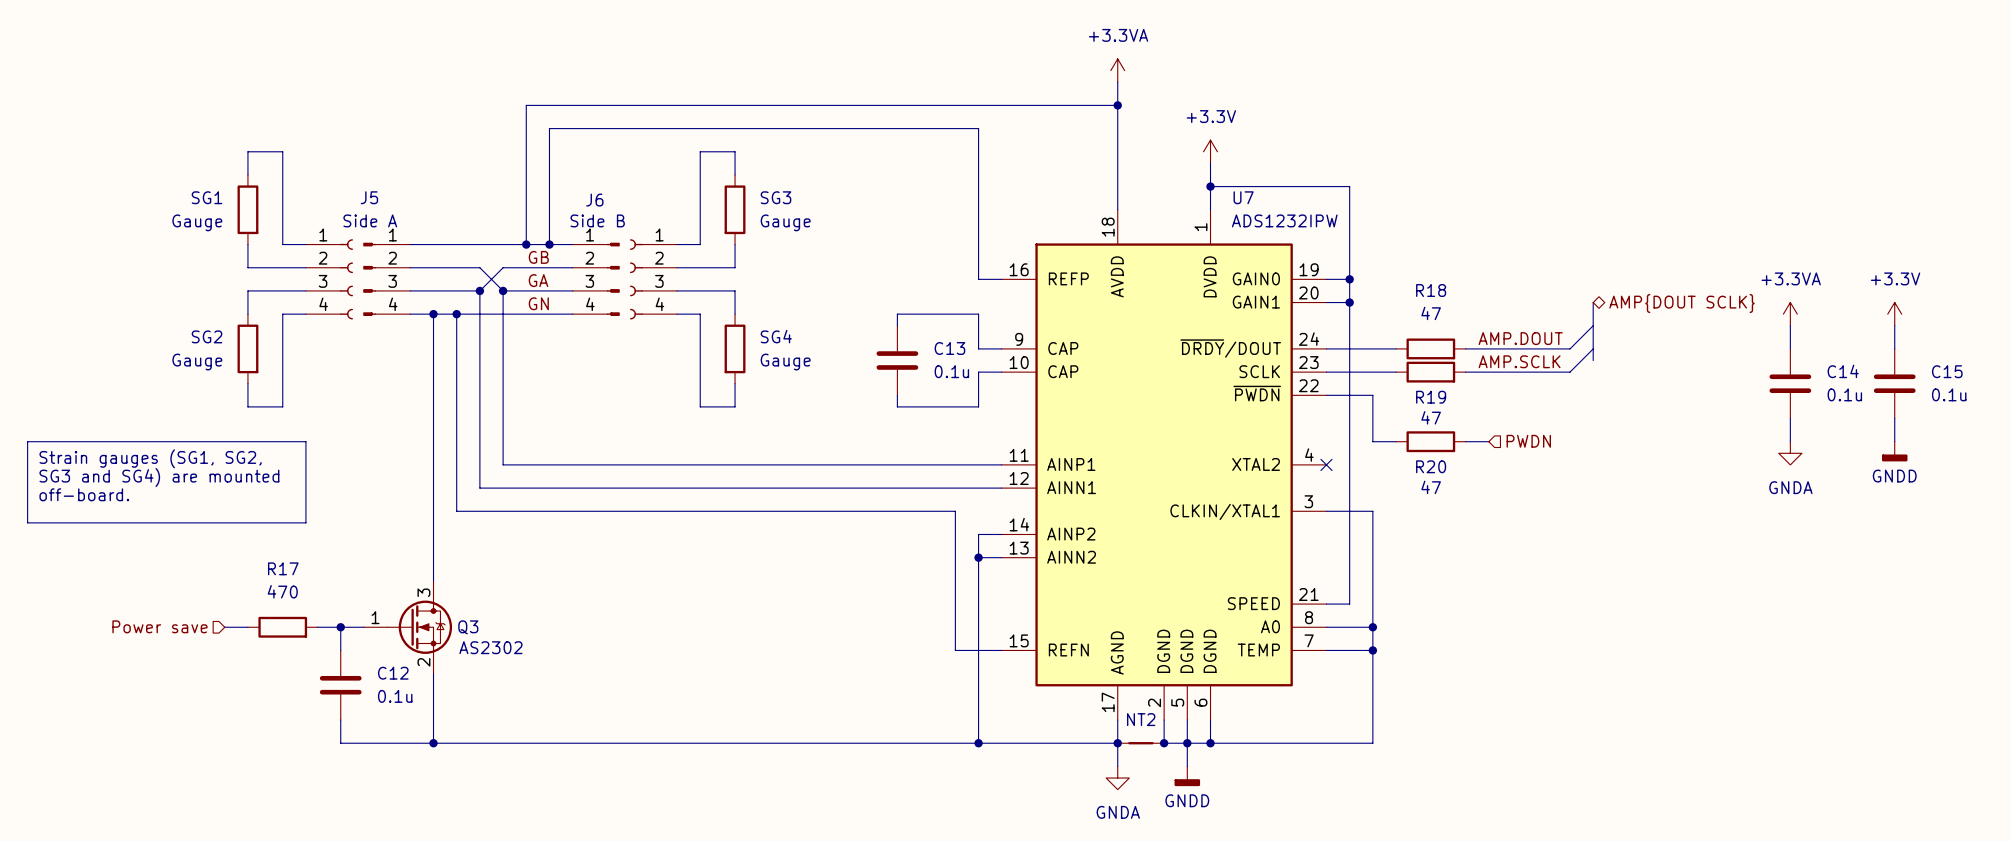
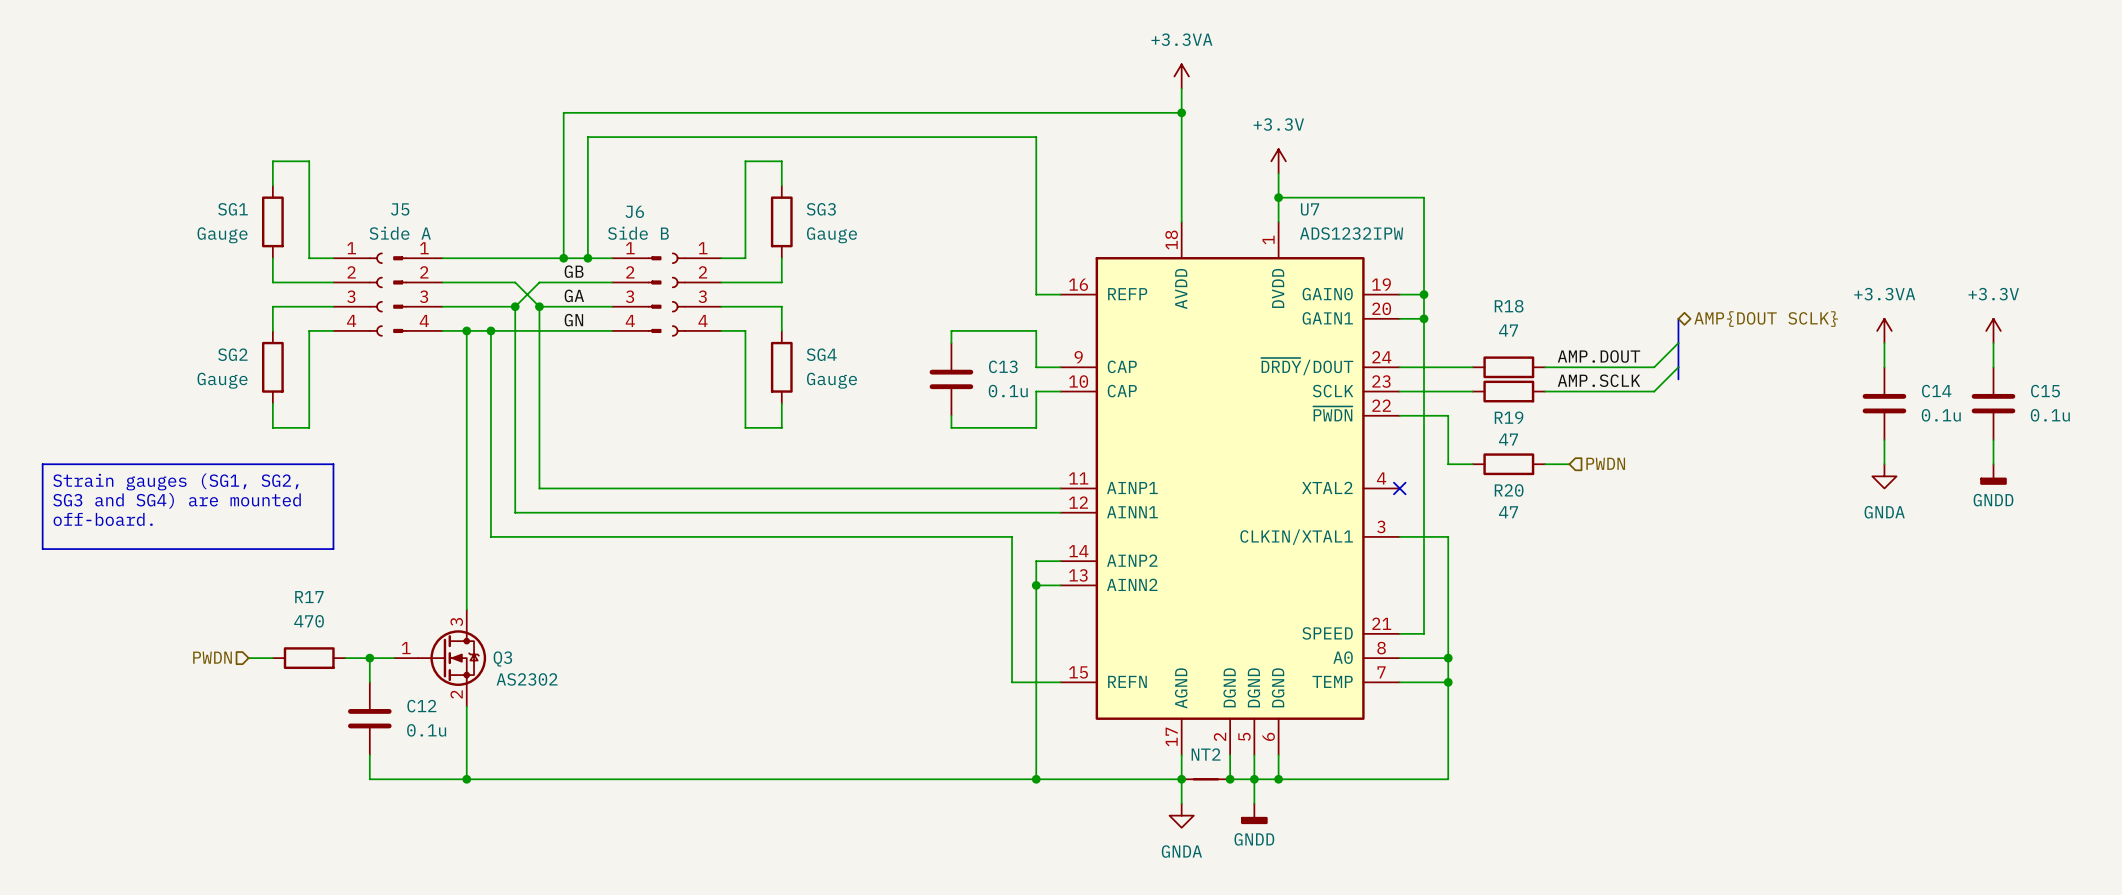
hierarchical label: Power save (159, 626) -> PWDN (212, 657)

